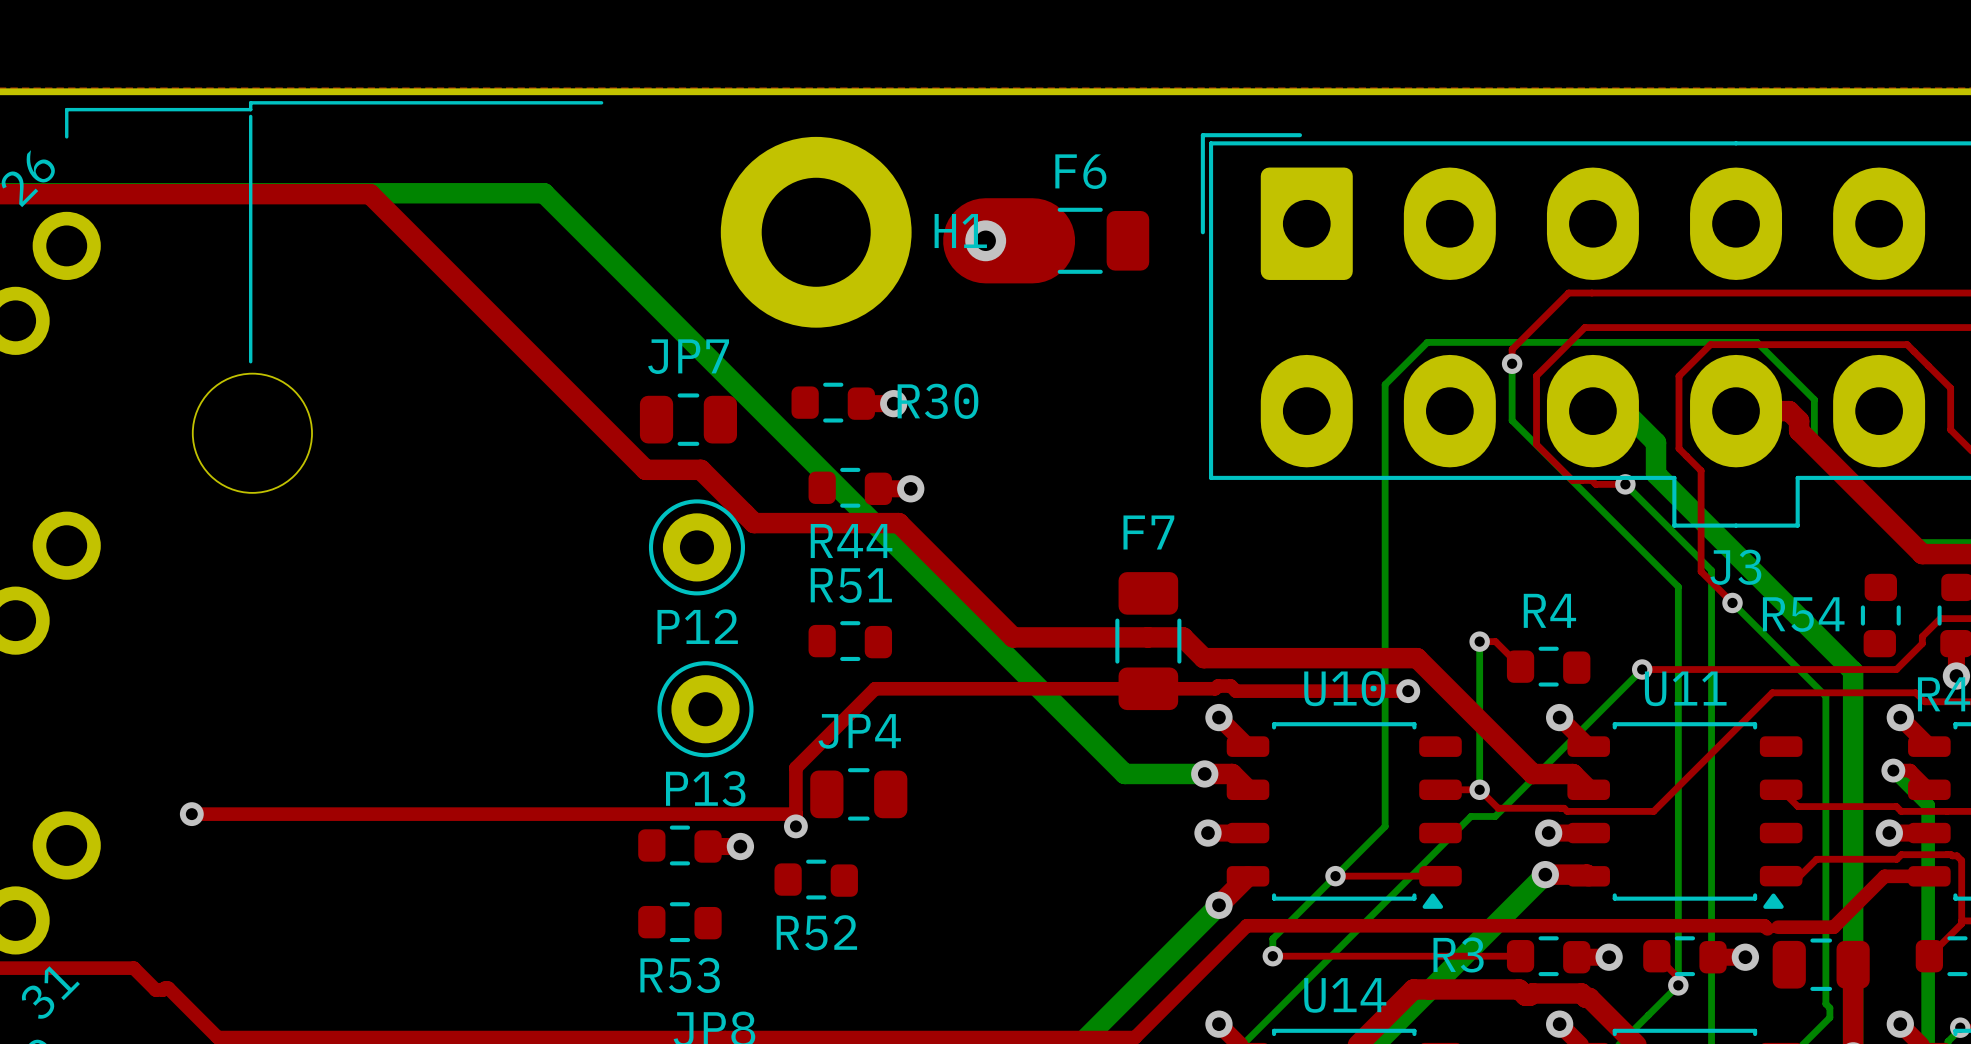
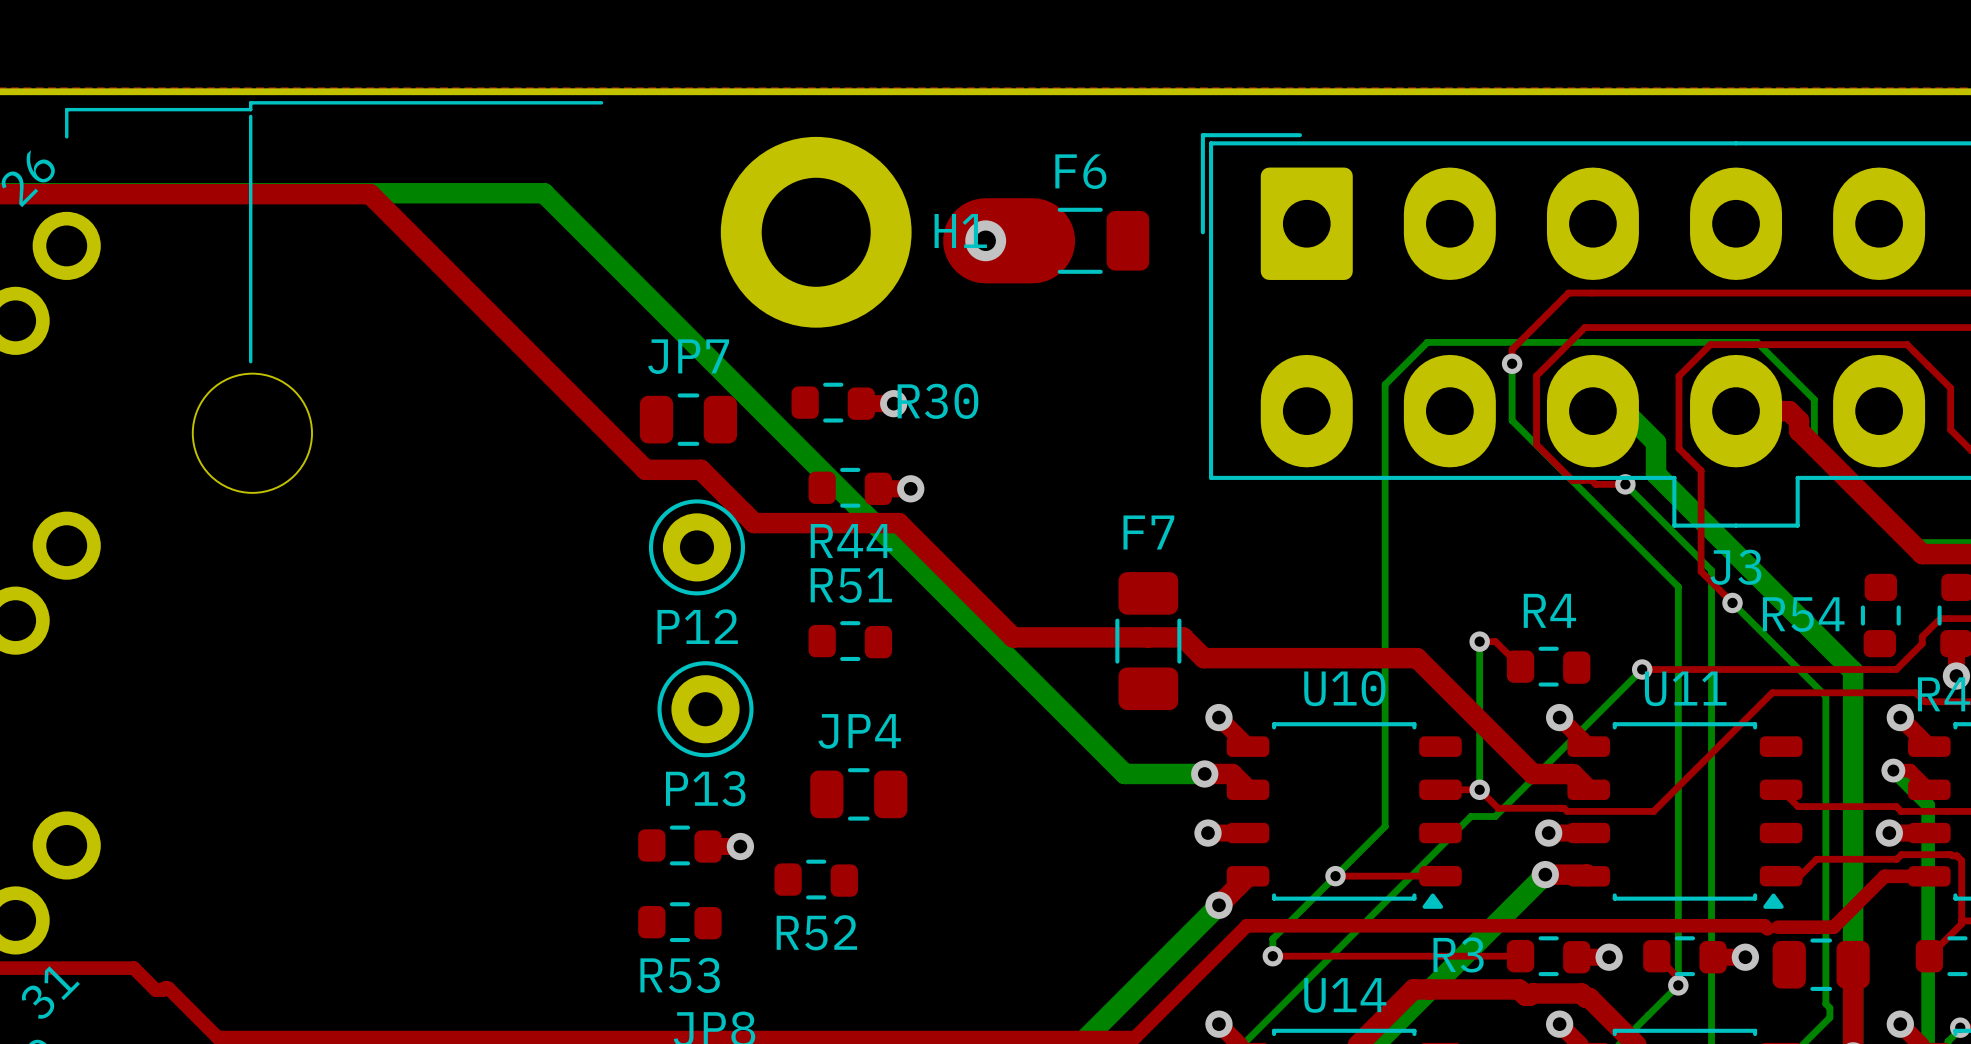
top track: (1408, 691) (1235, 691) (1230, 686) (1217, 686) (1215, 688) (875, 688) (795, 767) (795, 826) -> none
via: (1408, 691) -> none
top track: (191, 814) (795, 814) -> none
via: (191, 814) -> none
via: (795, 826) -> none

